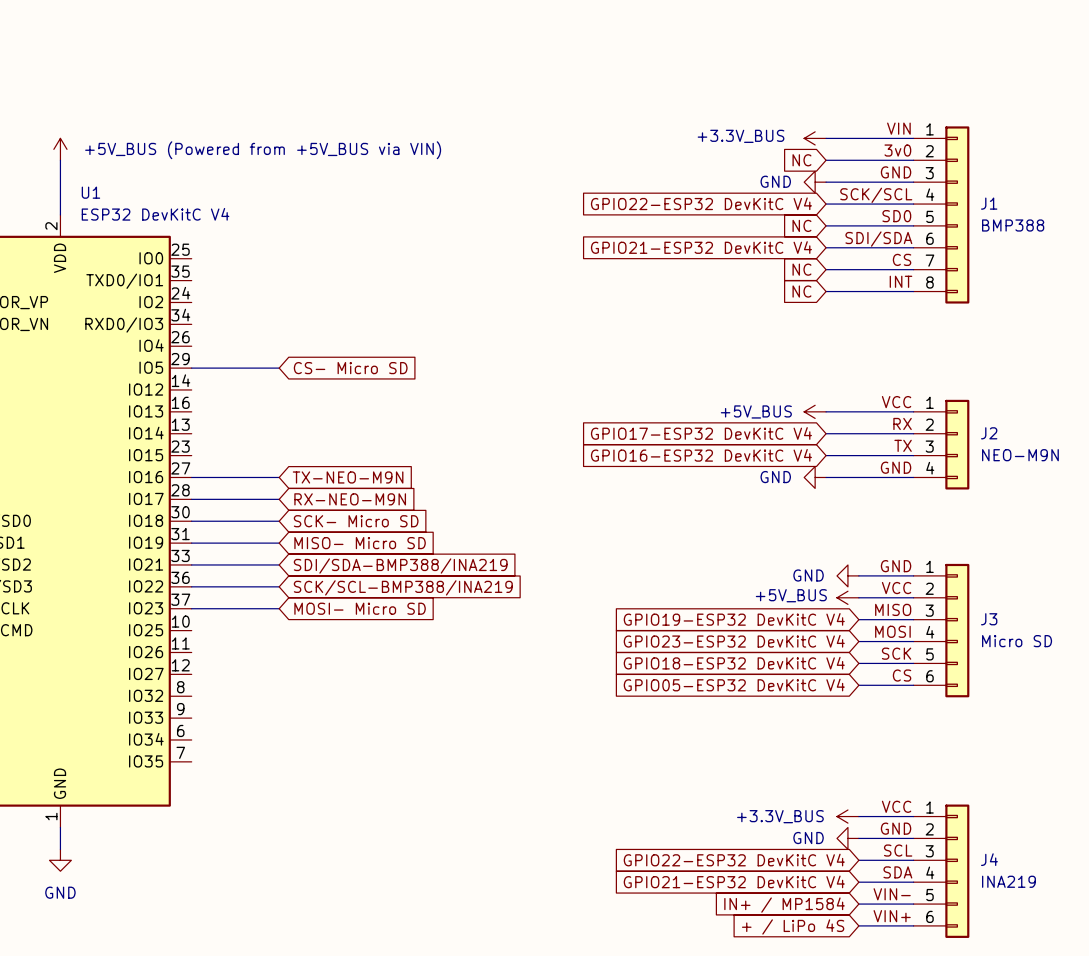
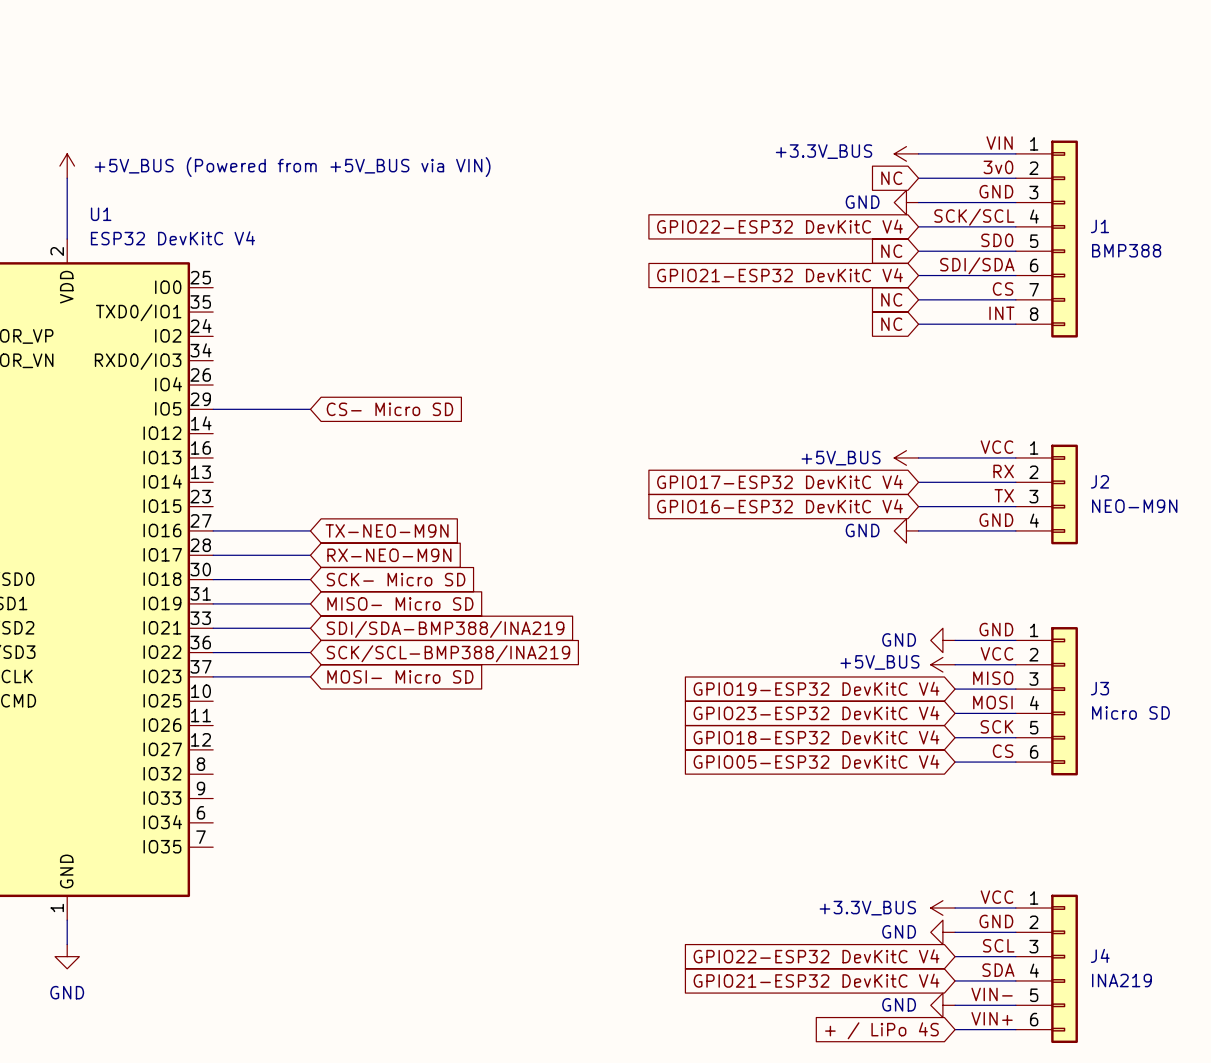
power symbol: none -> GND (942, 1005)
global label: IN+ / MP1584 (784, 905) -> none

